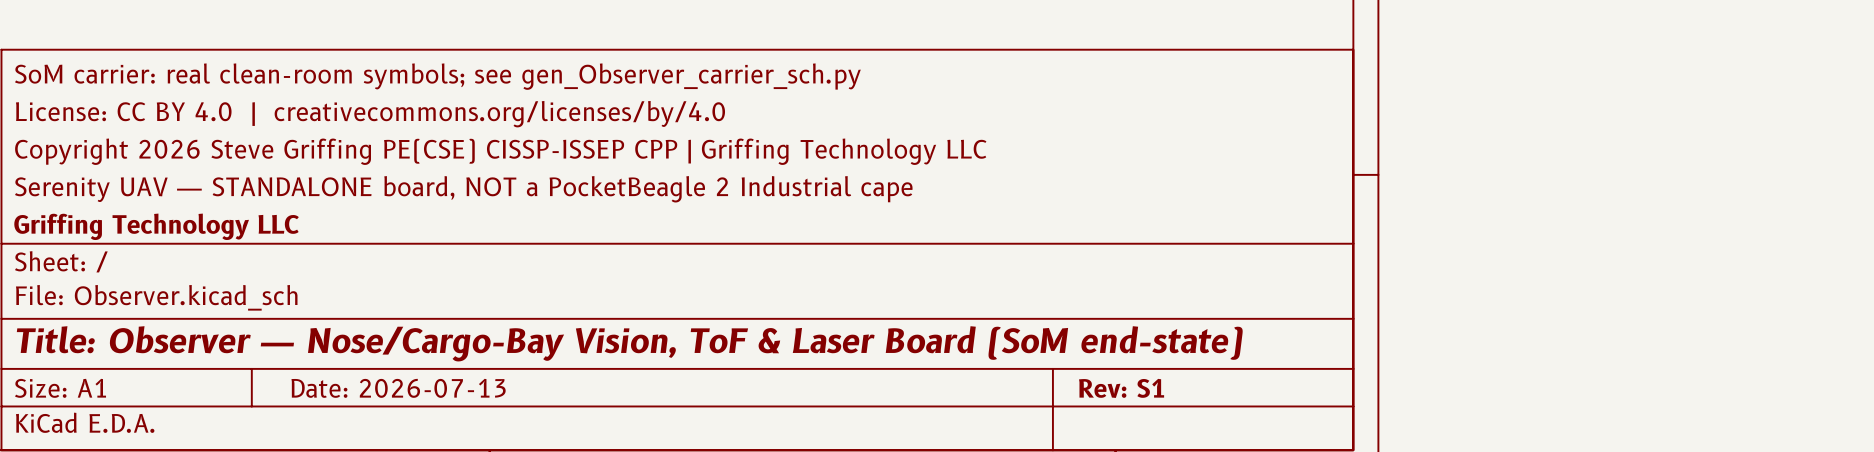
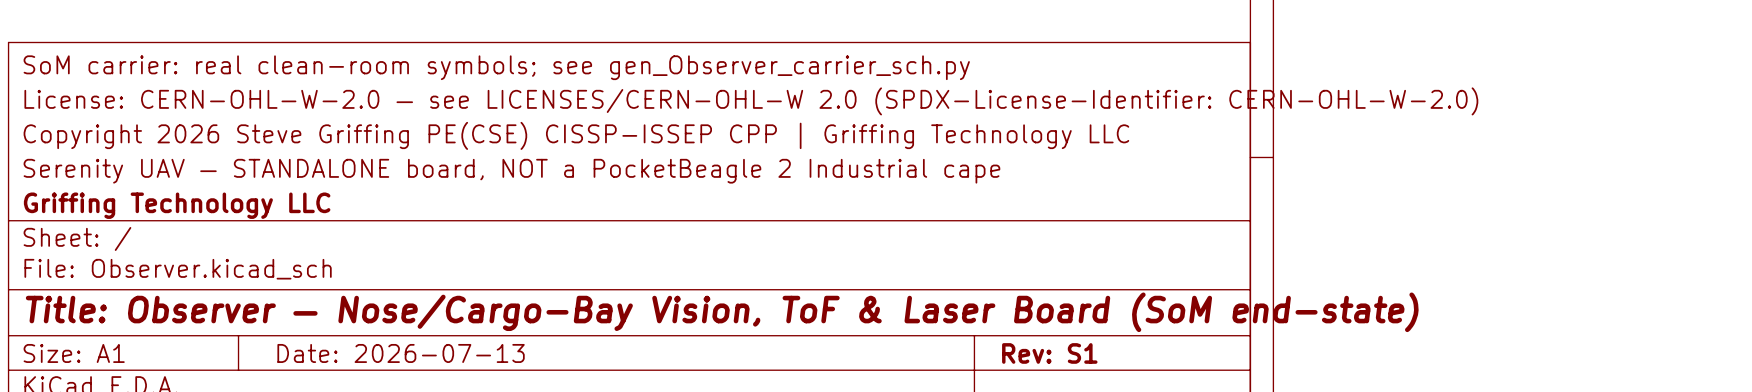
title block: License: CC BY 4.0 | creativecommons.org/licenses/by/4.0 (370, 114) -> License: CERN-OHL-W-2.0 — see LICENSES/CERN-OHL-W 2.0 (SPDX-License-Identifier: CERN-OHL-W-2.0) (751, 101)

